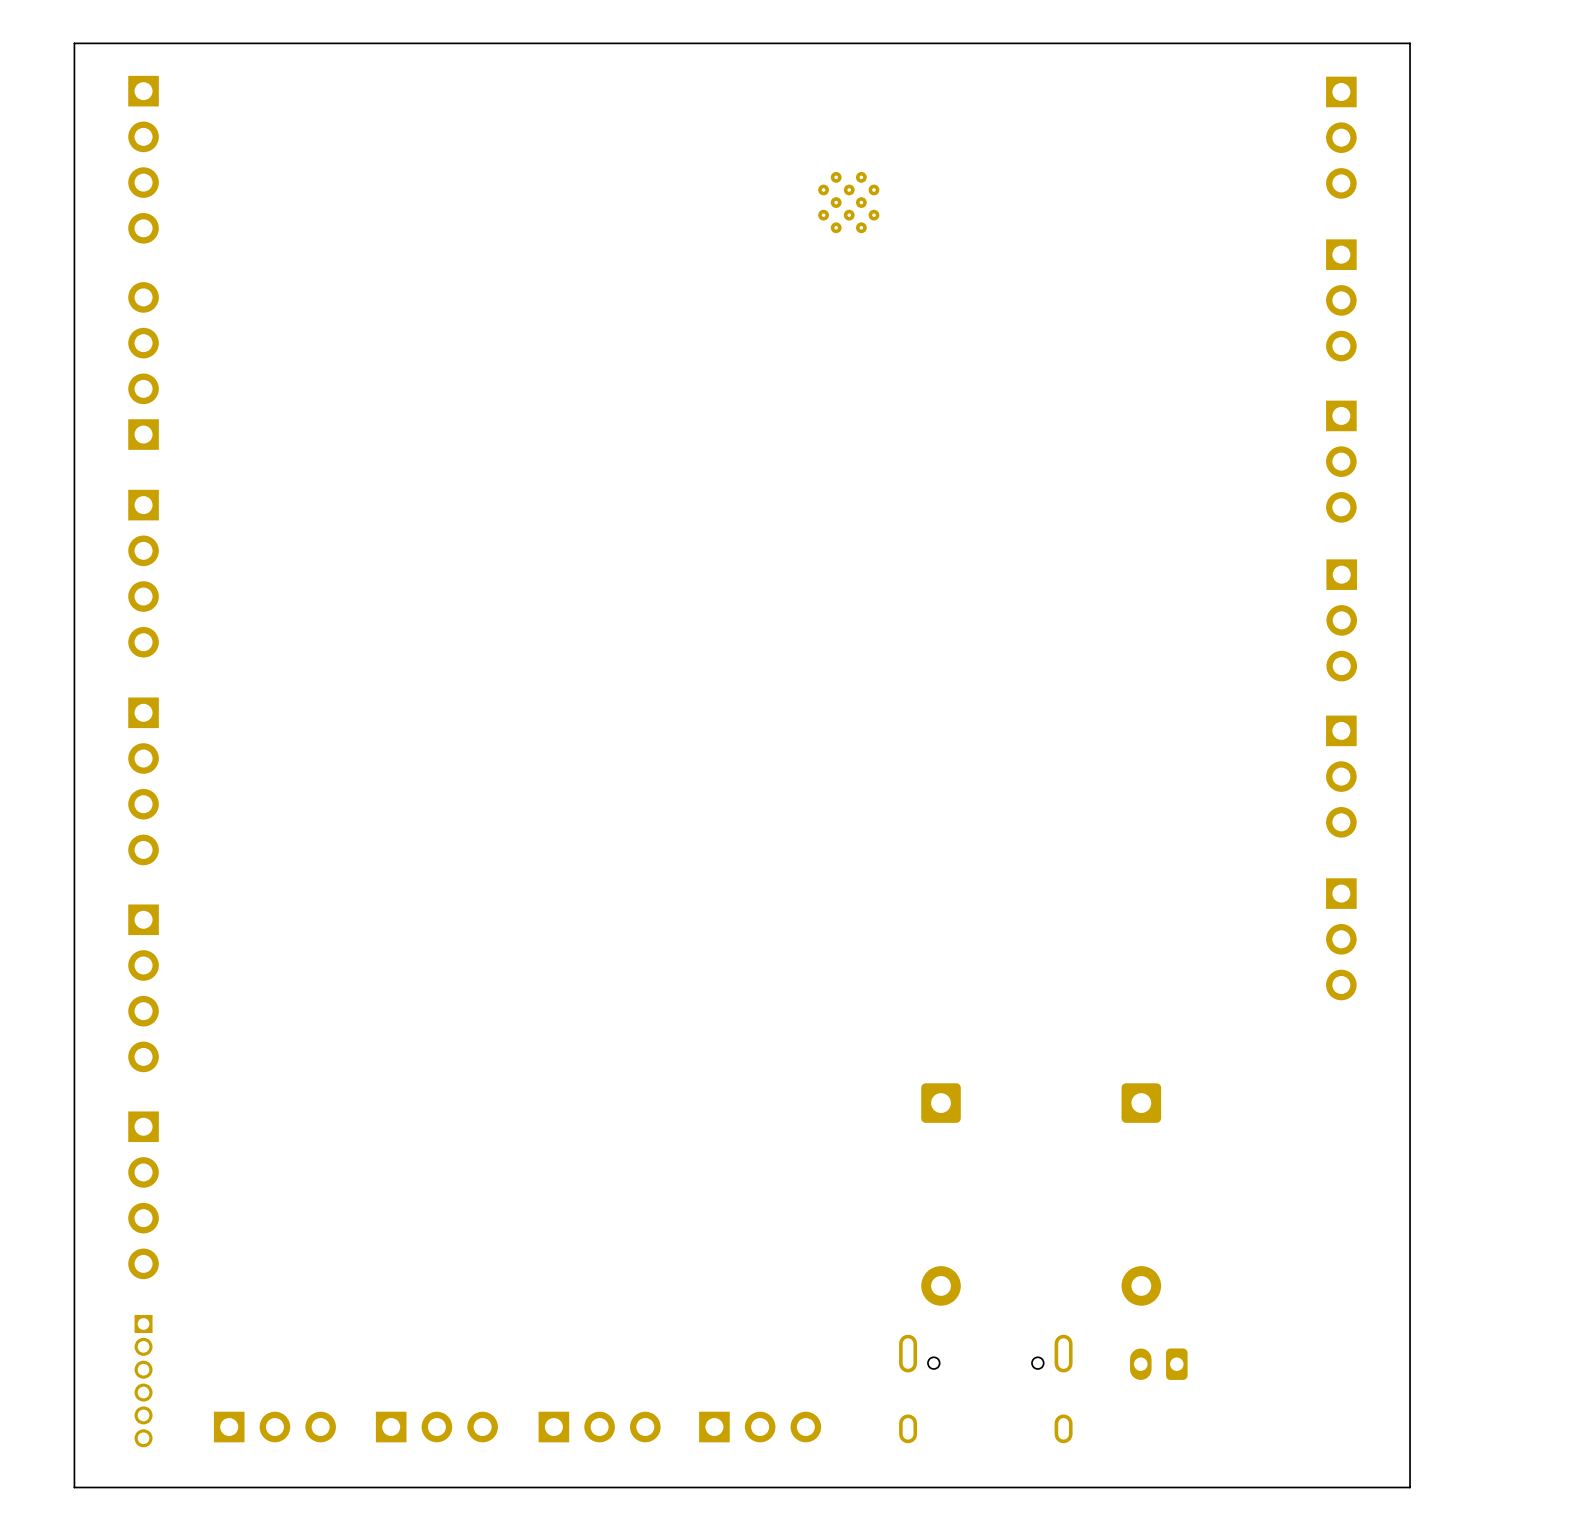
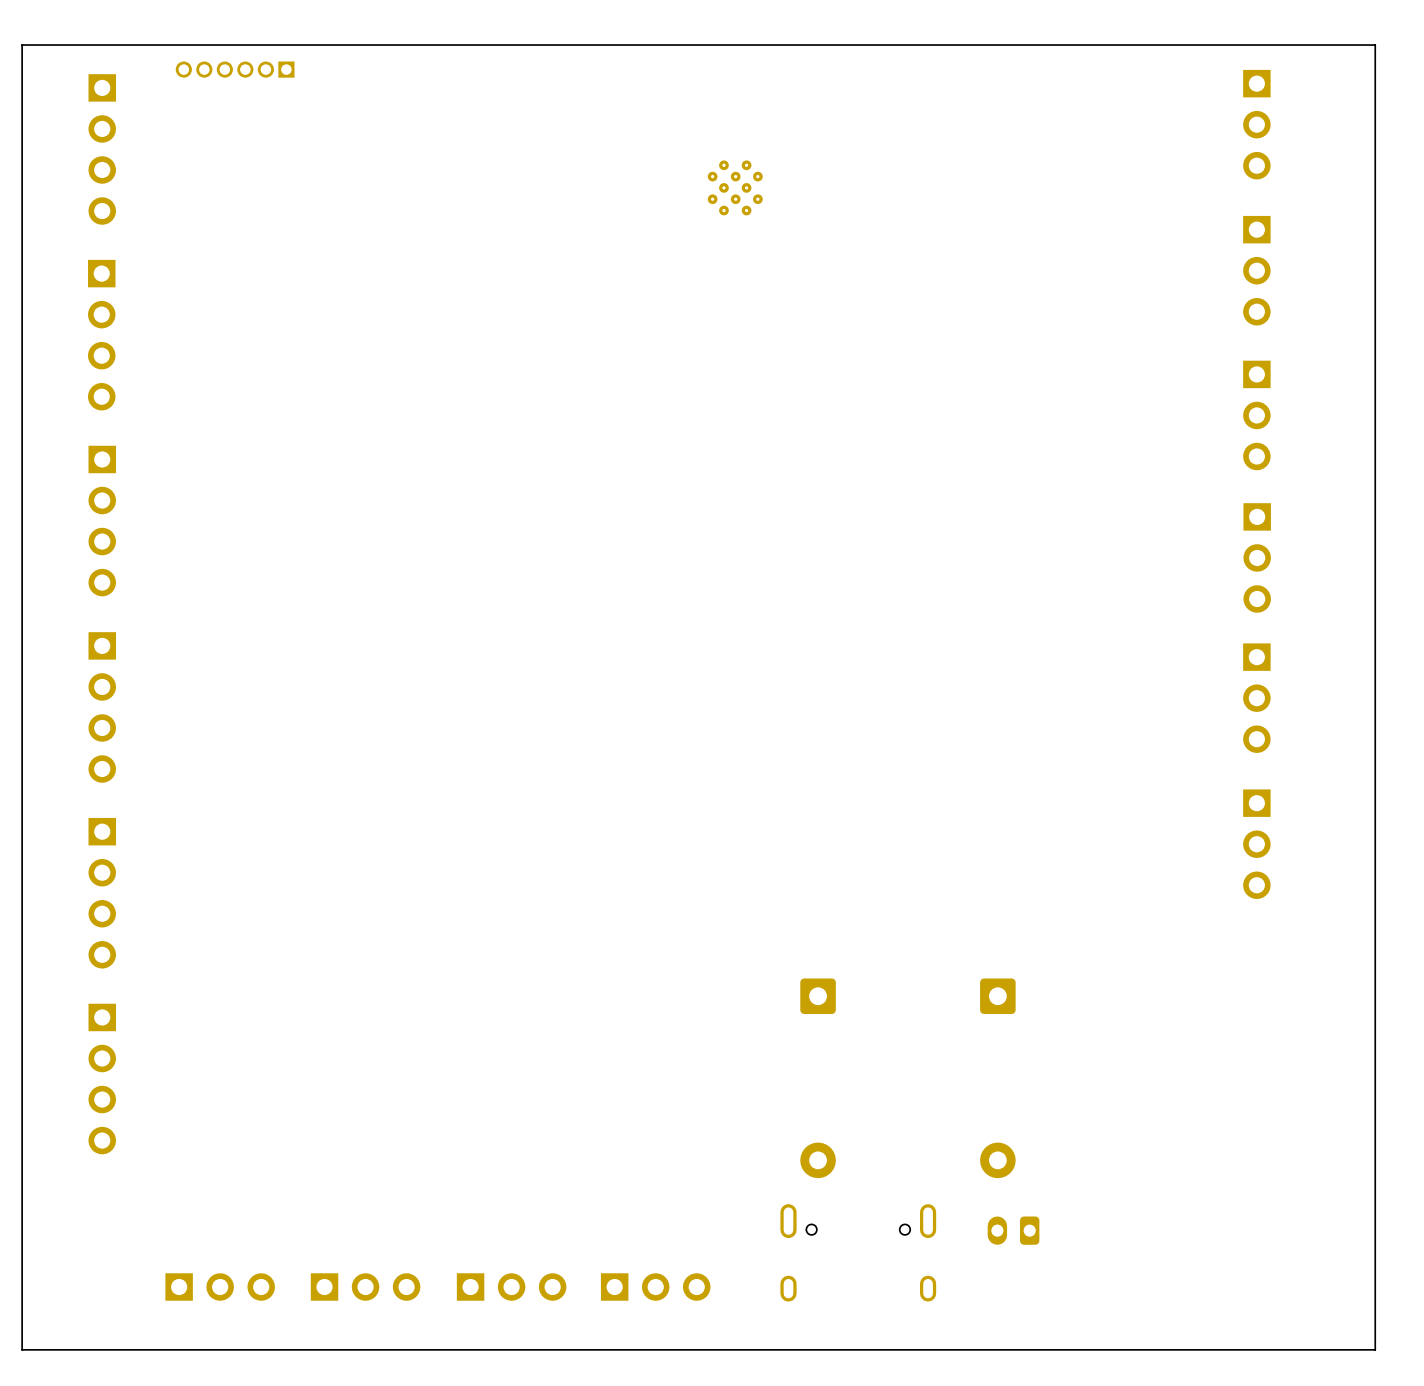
board edge: (1410, 43) (1410, 1487) (74, 1487) (74, 43) -> (1239, 45) (1375, 45) (1375, 1349) (22, 1349) (22, 45) (40, 45)
part: none -> (235, 69)
part position: (1341, 137) -> (1256, 124)
part position: (1341, 300) -> (1256, 270)
part rotation: 0° (143, 365) -> 180° (101, 335)
part: none -> (1256, 415)
part: (1341, 461) -> none
part: none -> (1257, 557)
part: (1341, 620) -> none
part: none -> (1256, 698)
part: (1341, 776) -> none
part position: (1341, 939) -> (1256, 844)
part: (143, 1381) -> none

